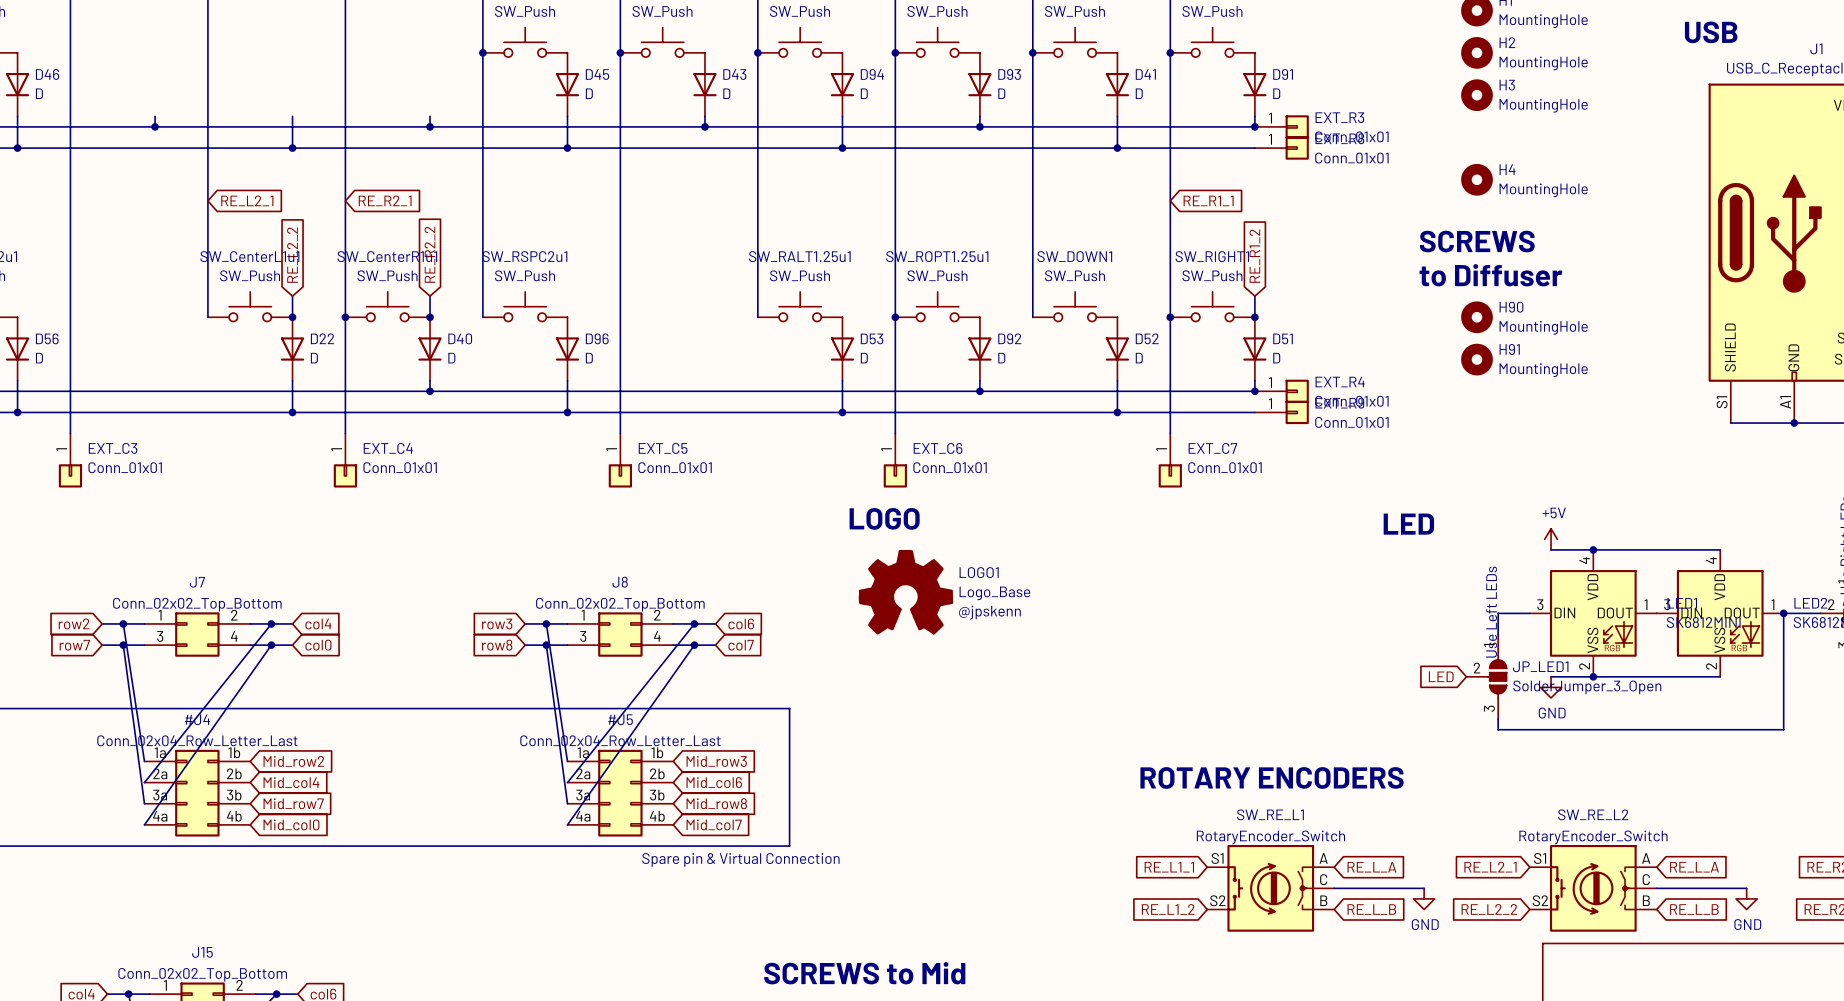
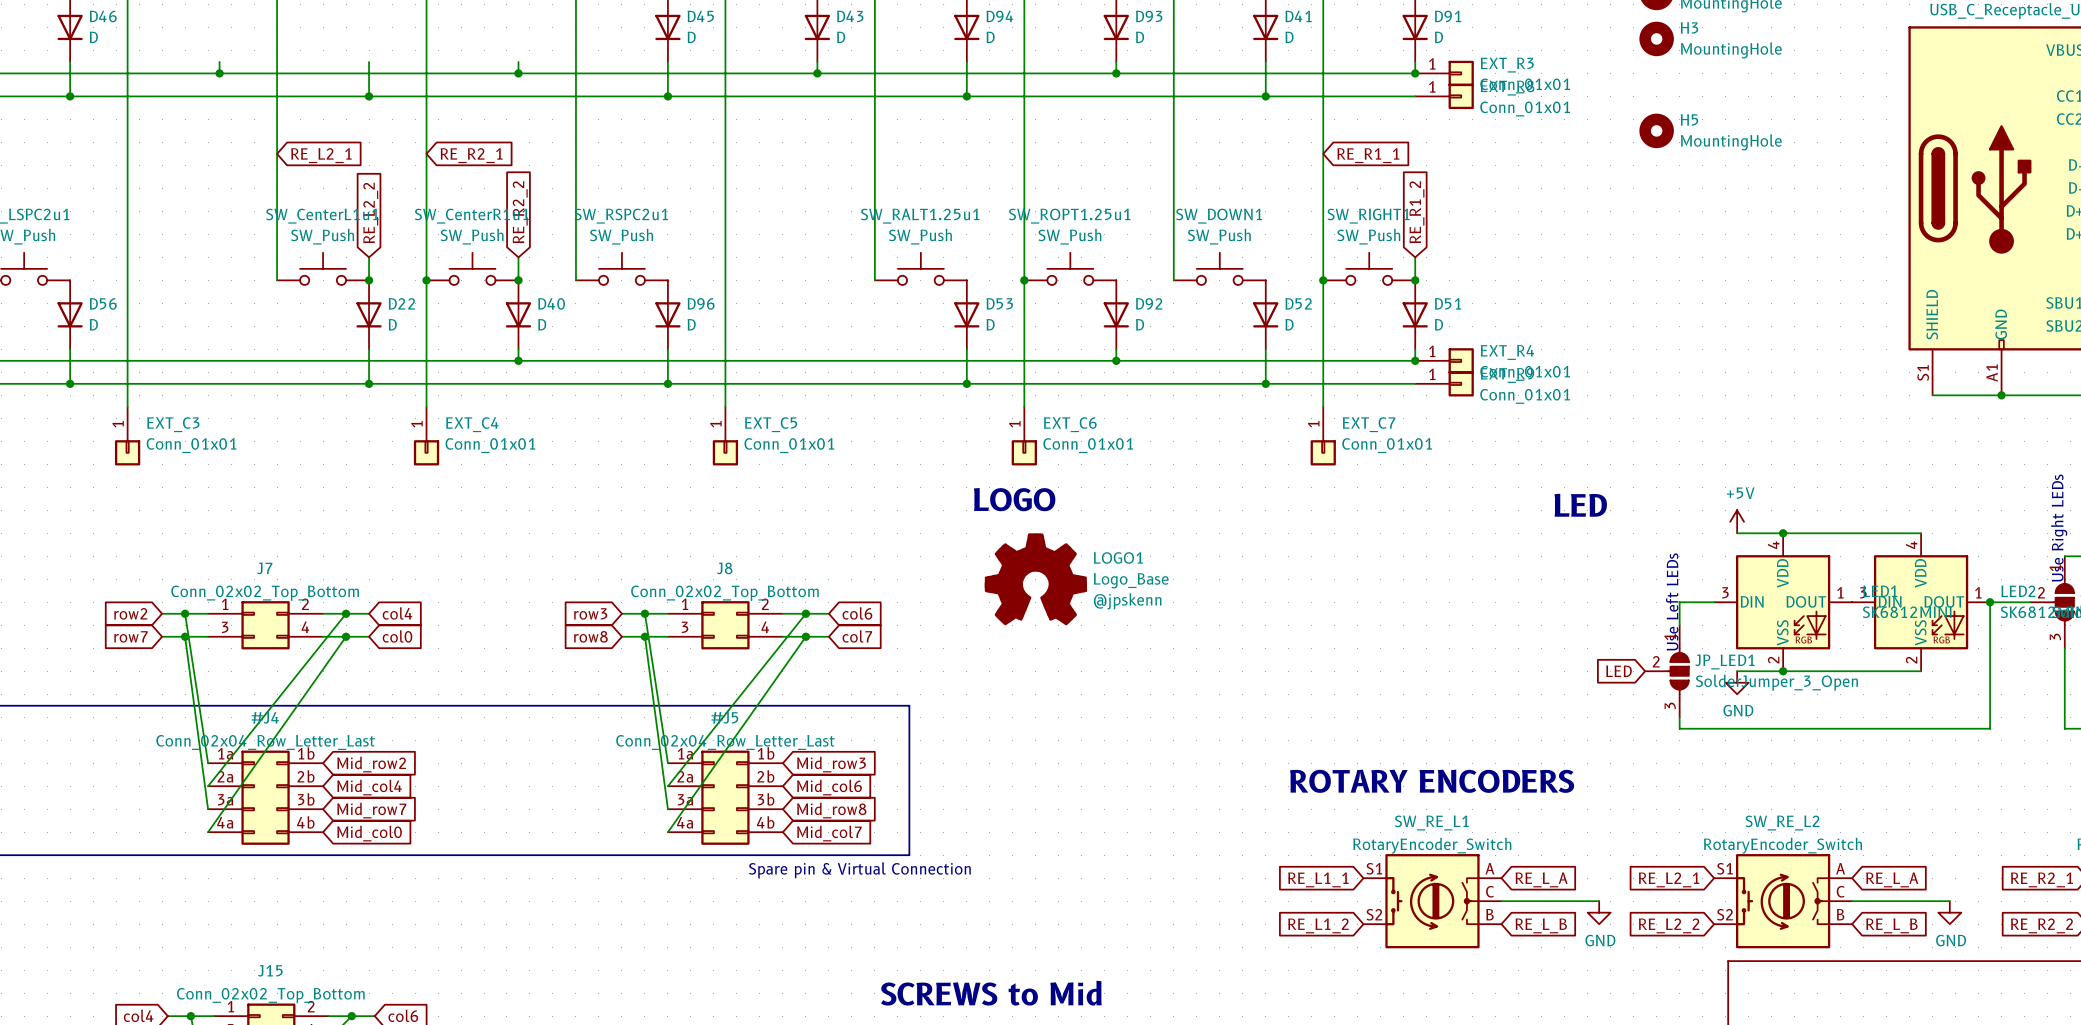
H4 name: H4 (1507, 169) -> H5 (1689, 119)
text: SCREWS (1477, 241) -> none
text: to Diffuser (1490, 275) -> none
H90: MountingHole (1476, 317) -> none
H91: MountingHole (1476, 359) -> none

